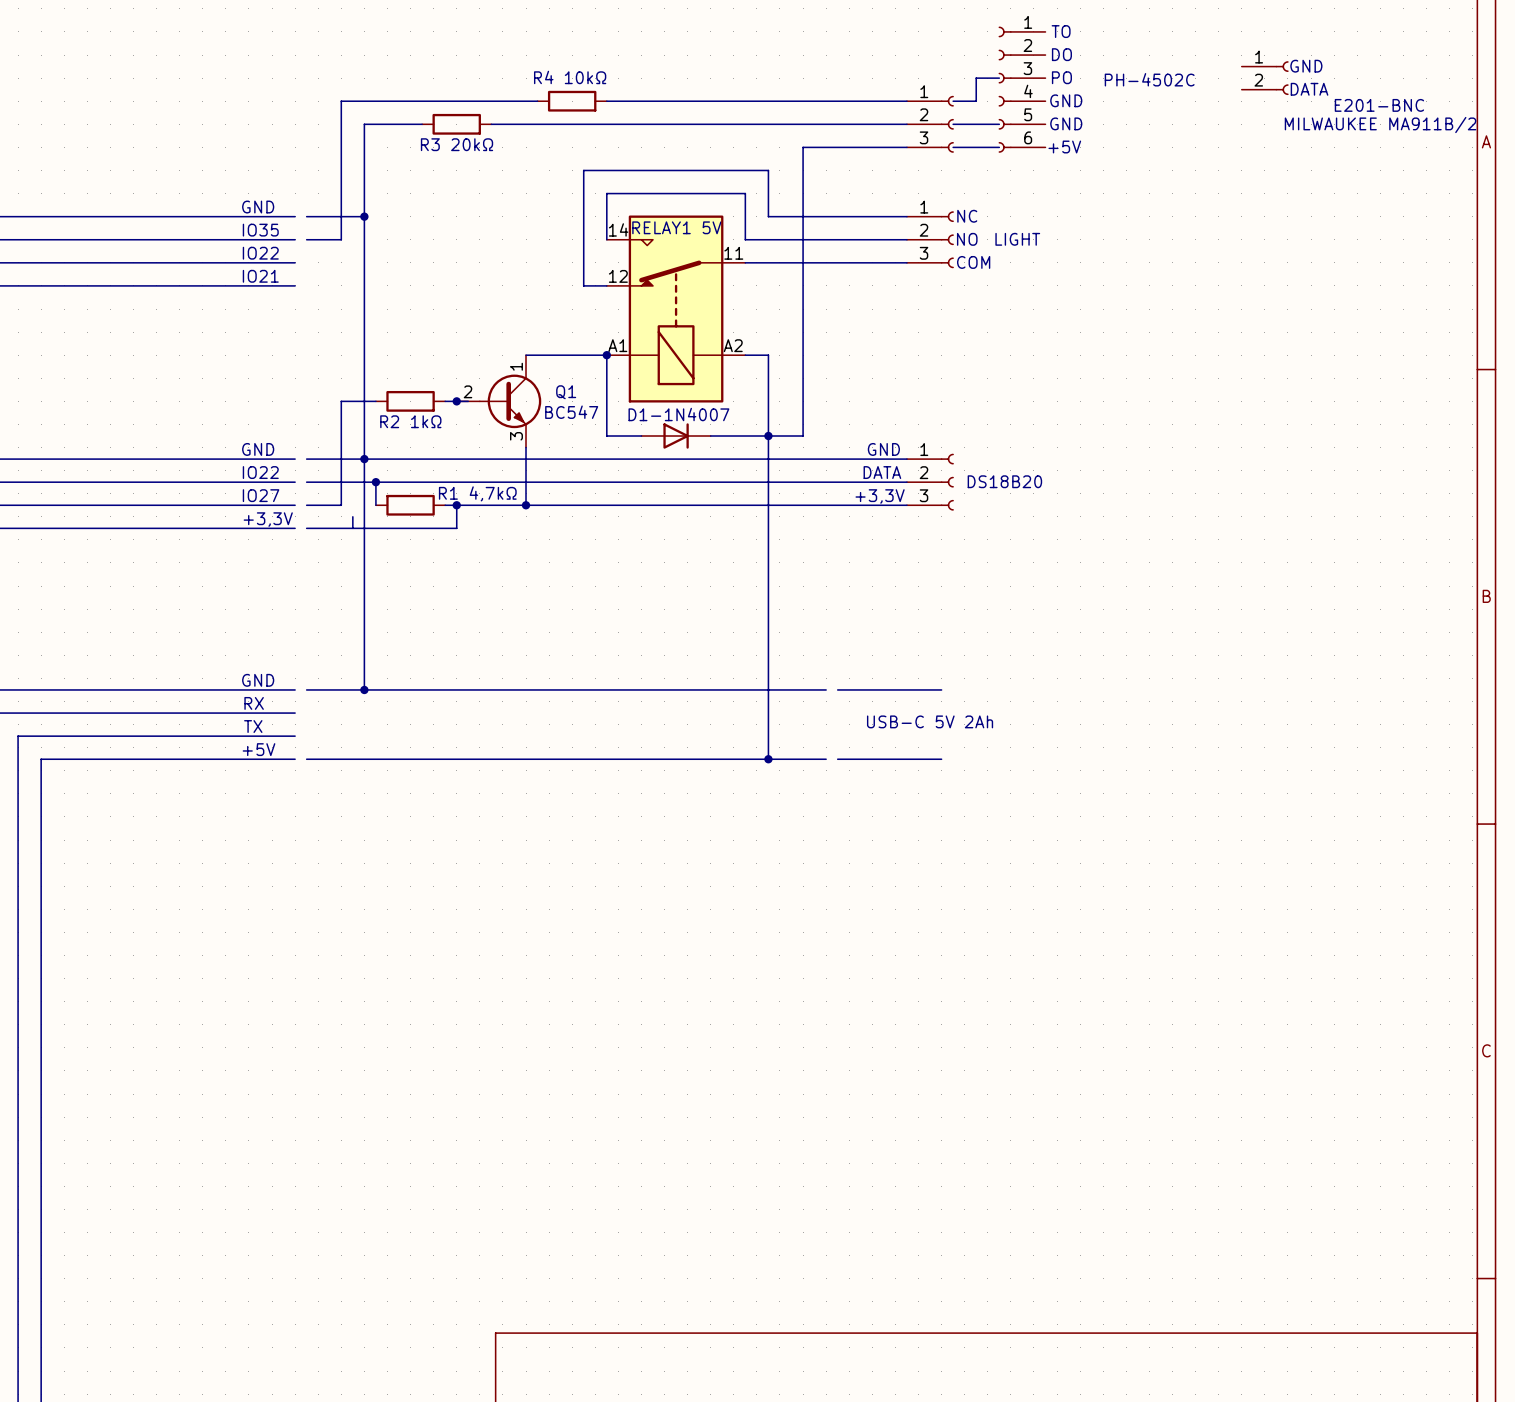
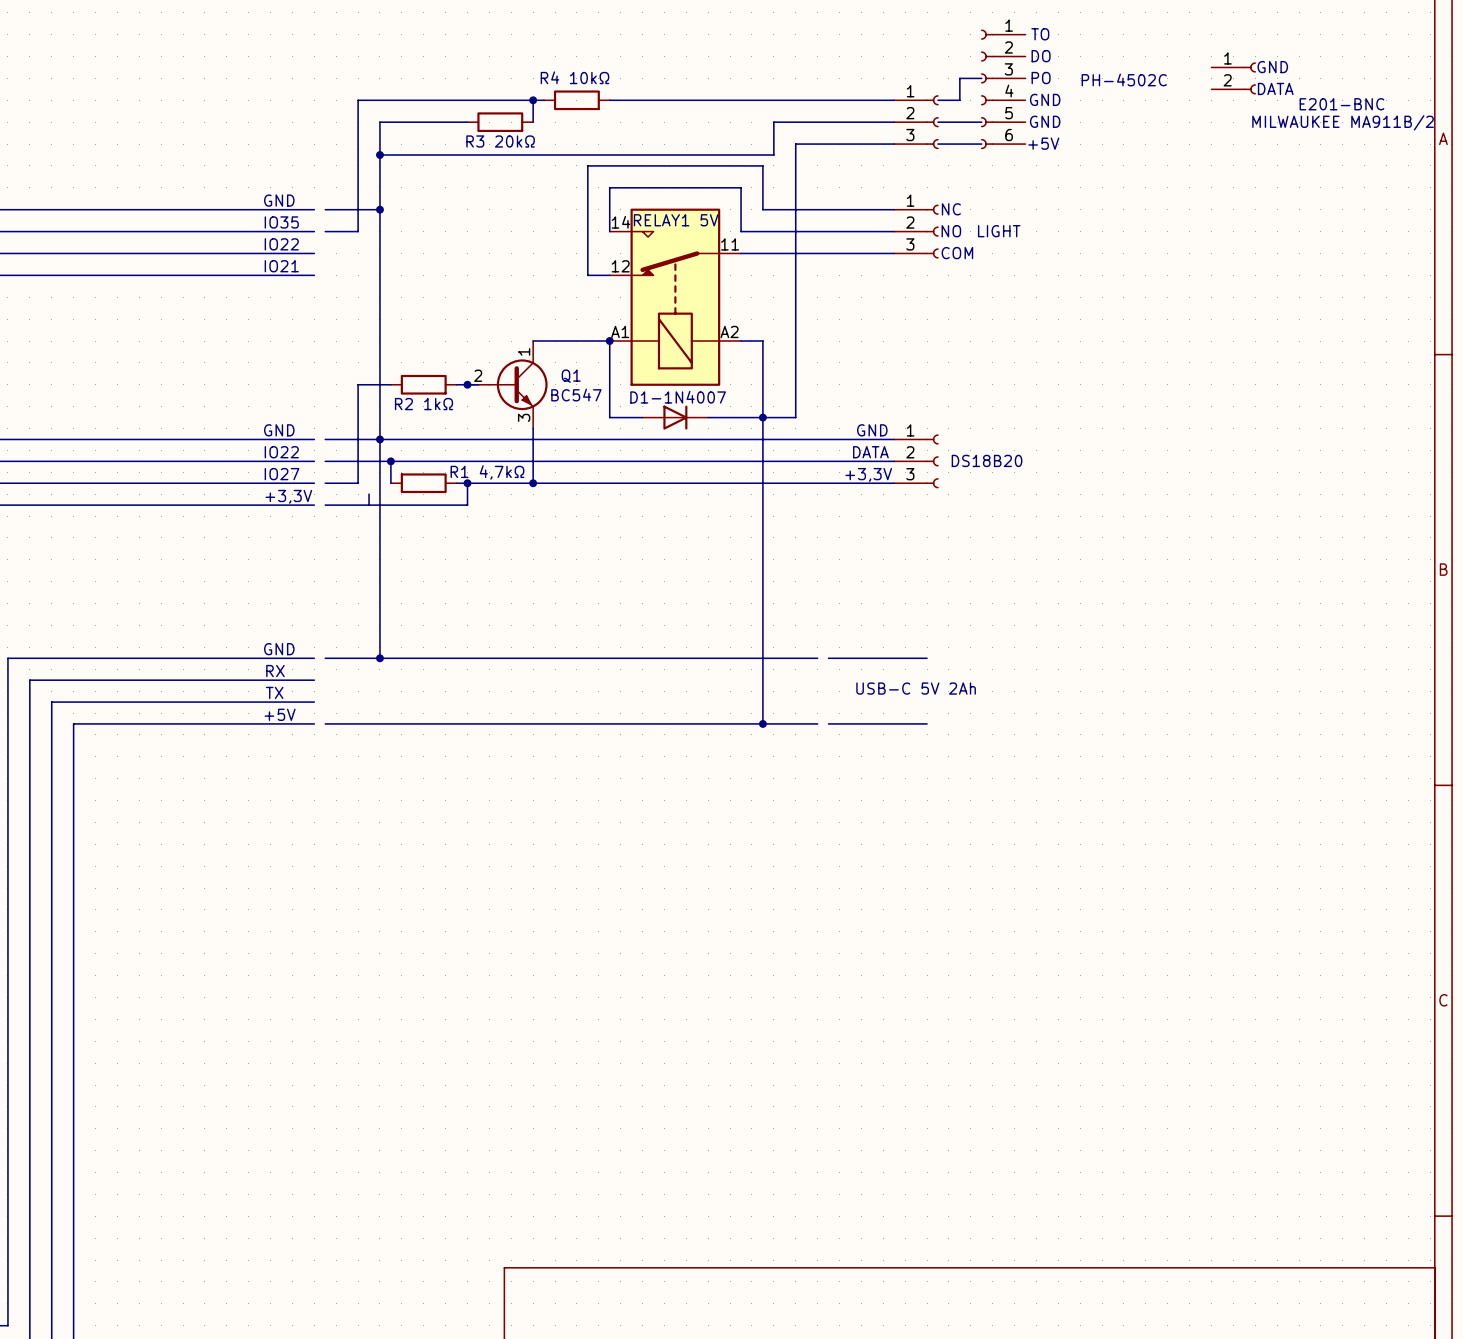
wire: none -> (533, 100) (533, 122)
junction: none -> (533, 100)
wire: none -> (434, 122) (467, 122)
part position: (456, 124) -> (500, 122)
wire: (491, 124) (779, 124) -> (379, 155) (773, 155) (773, 122)
text position: R3 20kΩ (457, 144) -> R3 20kΩ (500, 141)
junction: none -> (379, 155)

